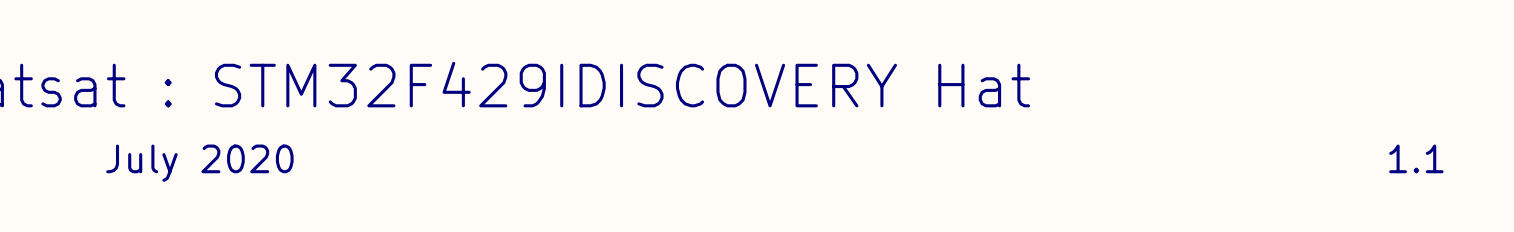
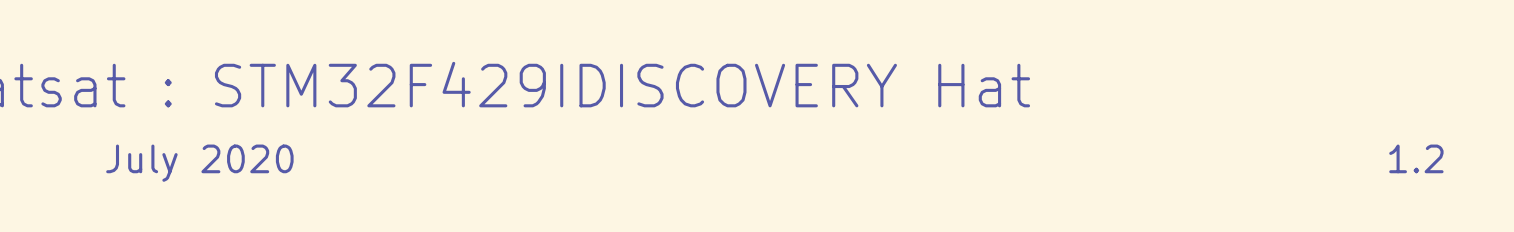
text: 1.1 (1416, 158) -> 1.2 (1416, 158)

